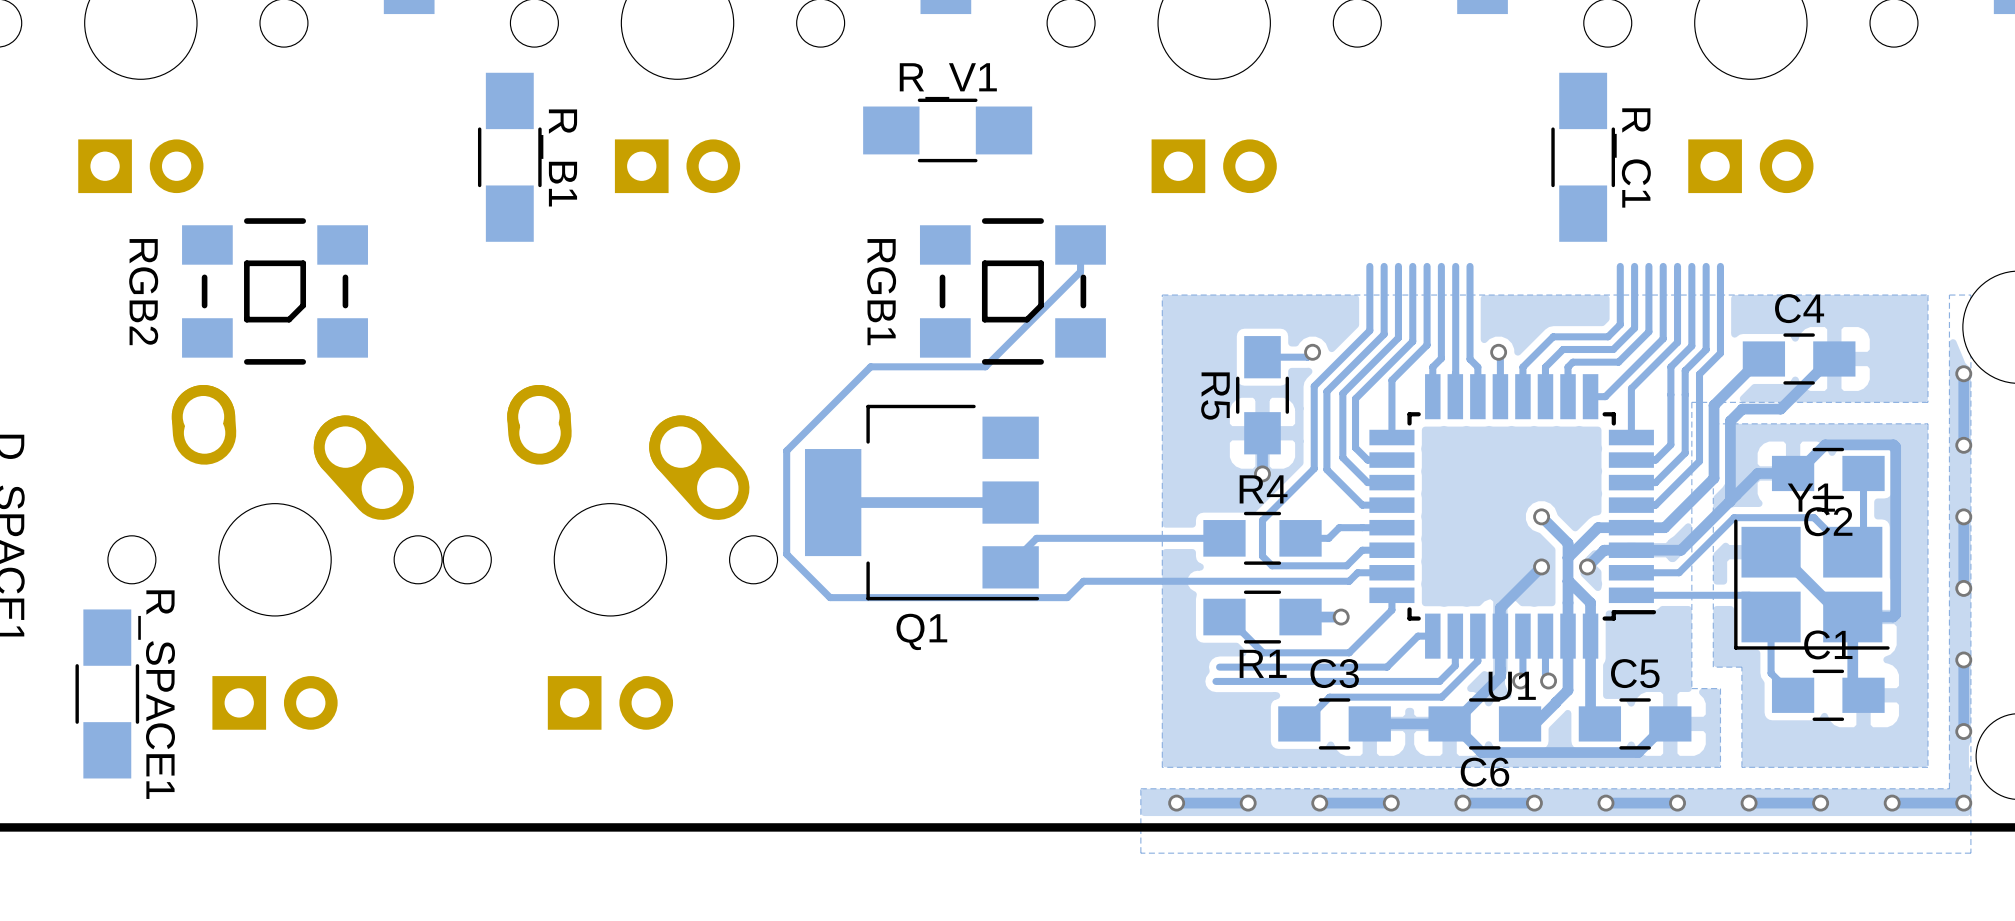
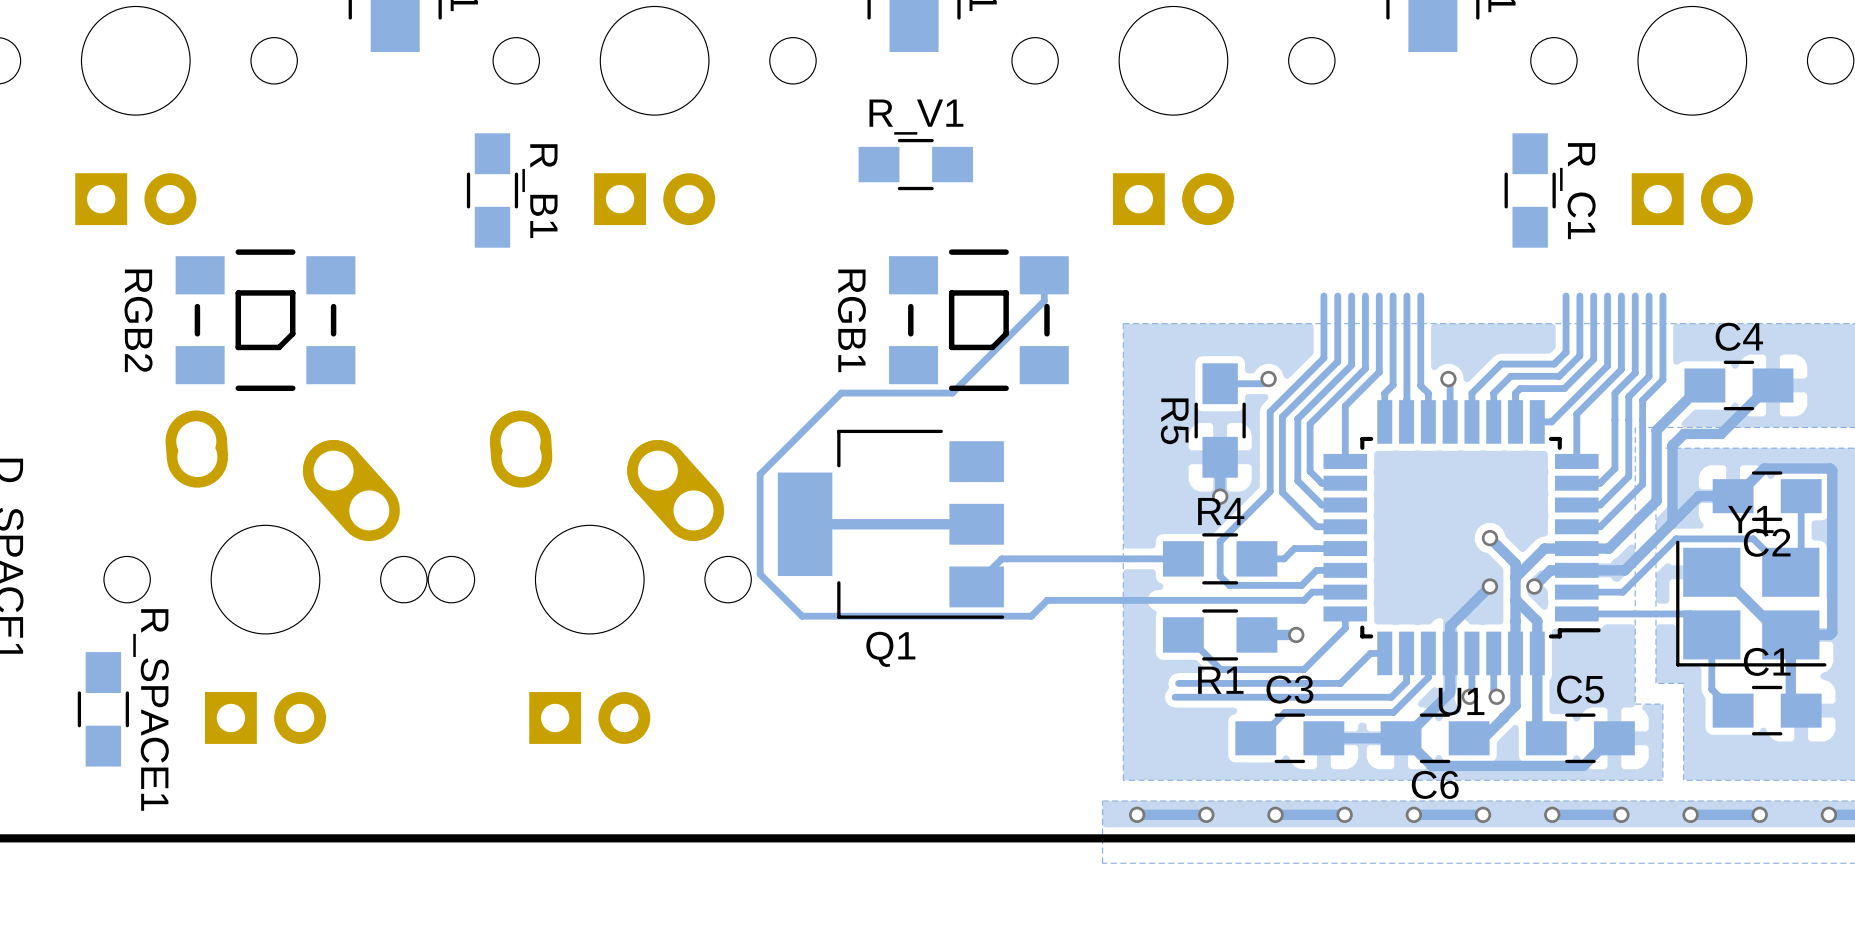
R_B1 footprint: [477, 72, 542, 242] -> [466, 133, 519, 248]
R_C1 footprint: [1551, 72, 1616, 242] -> [1504, 133, 1556, 248]
R_V1 footprint: [863, 98, 1033, 163] -> [858, 138, 973, 191]
R_SPACE1 footprint: [75, 609, 140, 779] -> [77, 652, 129, 767]

